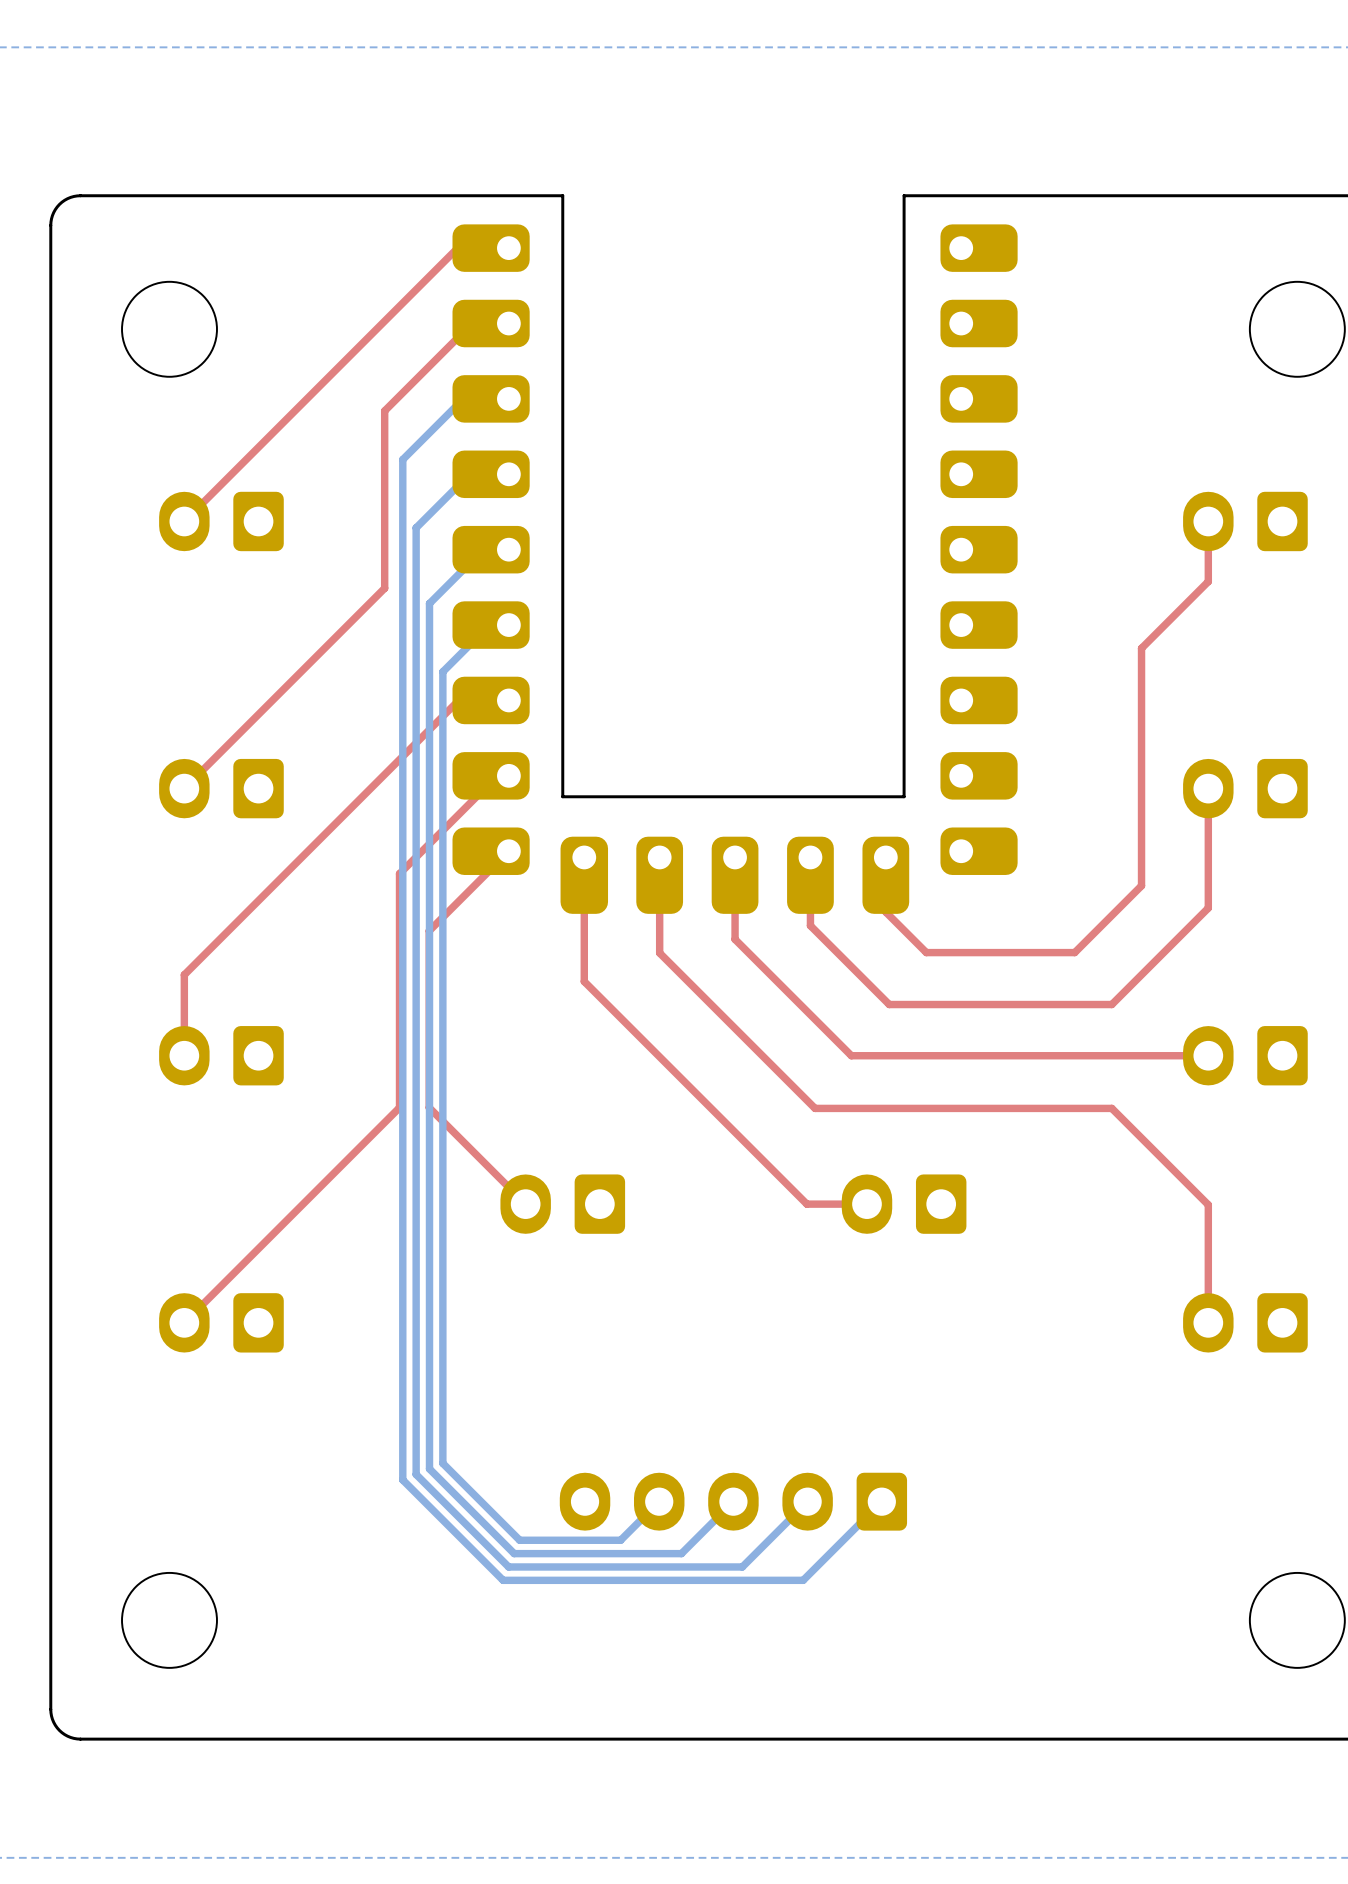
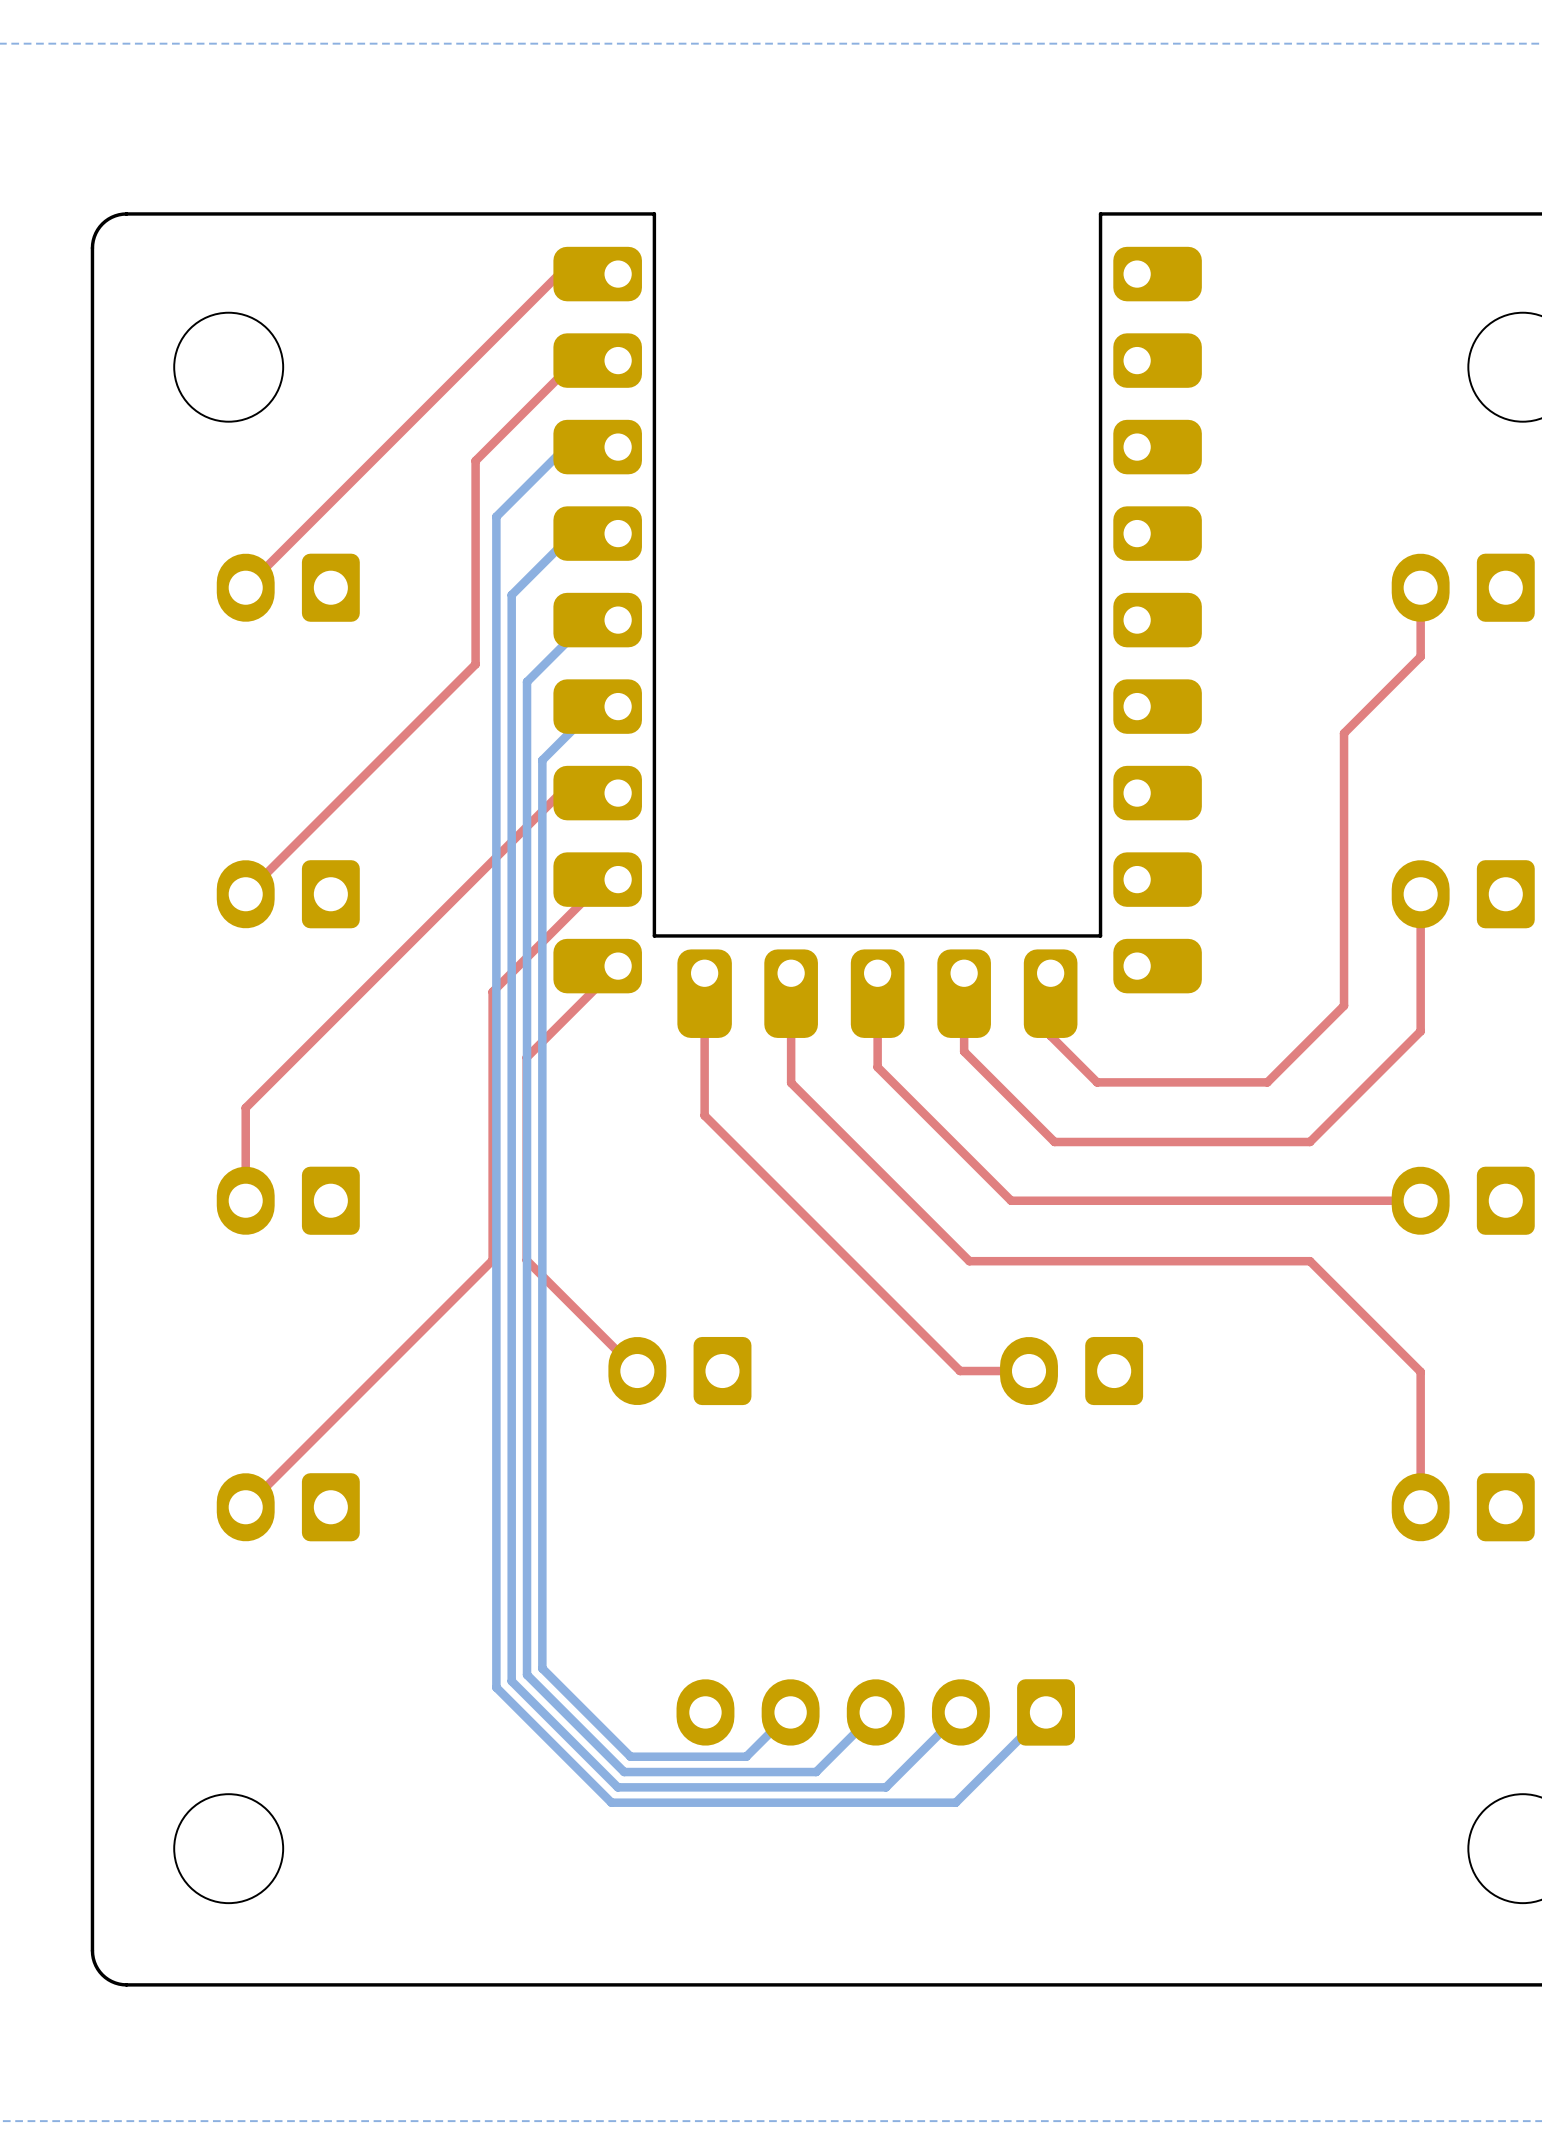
board edge: (929, 195) (904, 195) (904, 796) (562, 796) (562, 195) (540, 195) -> (1100, 213) (1100, 935) (654, 935) (654, 213)

